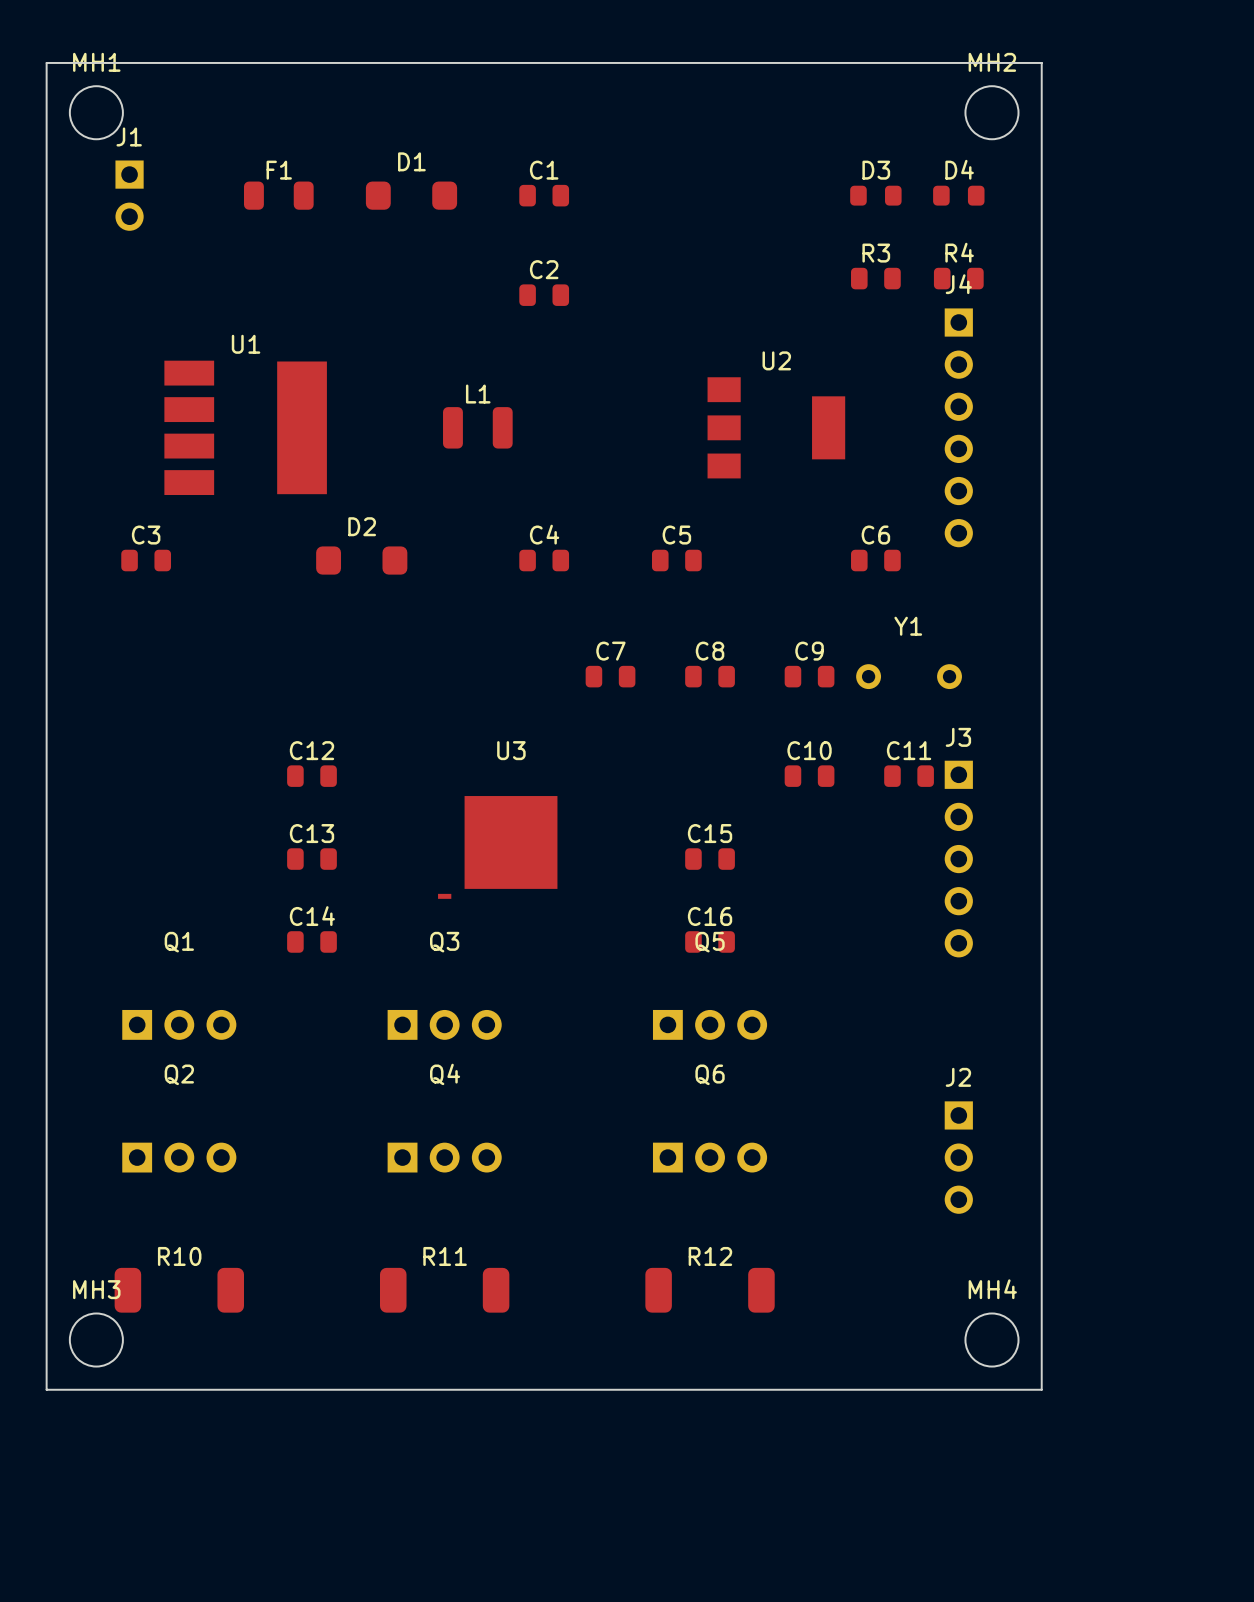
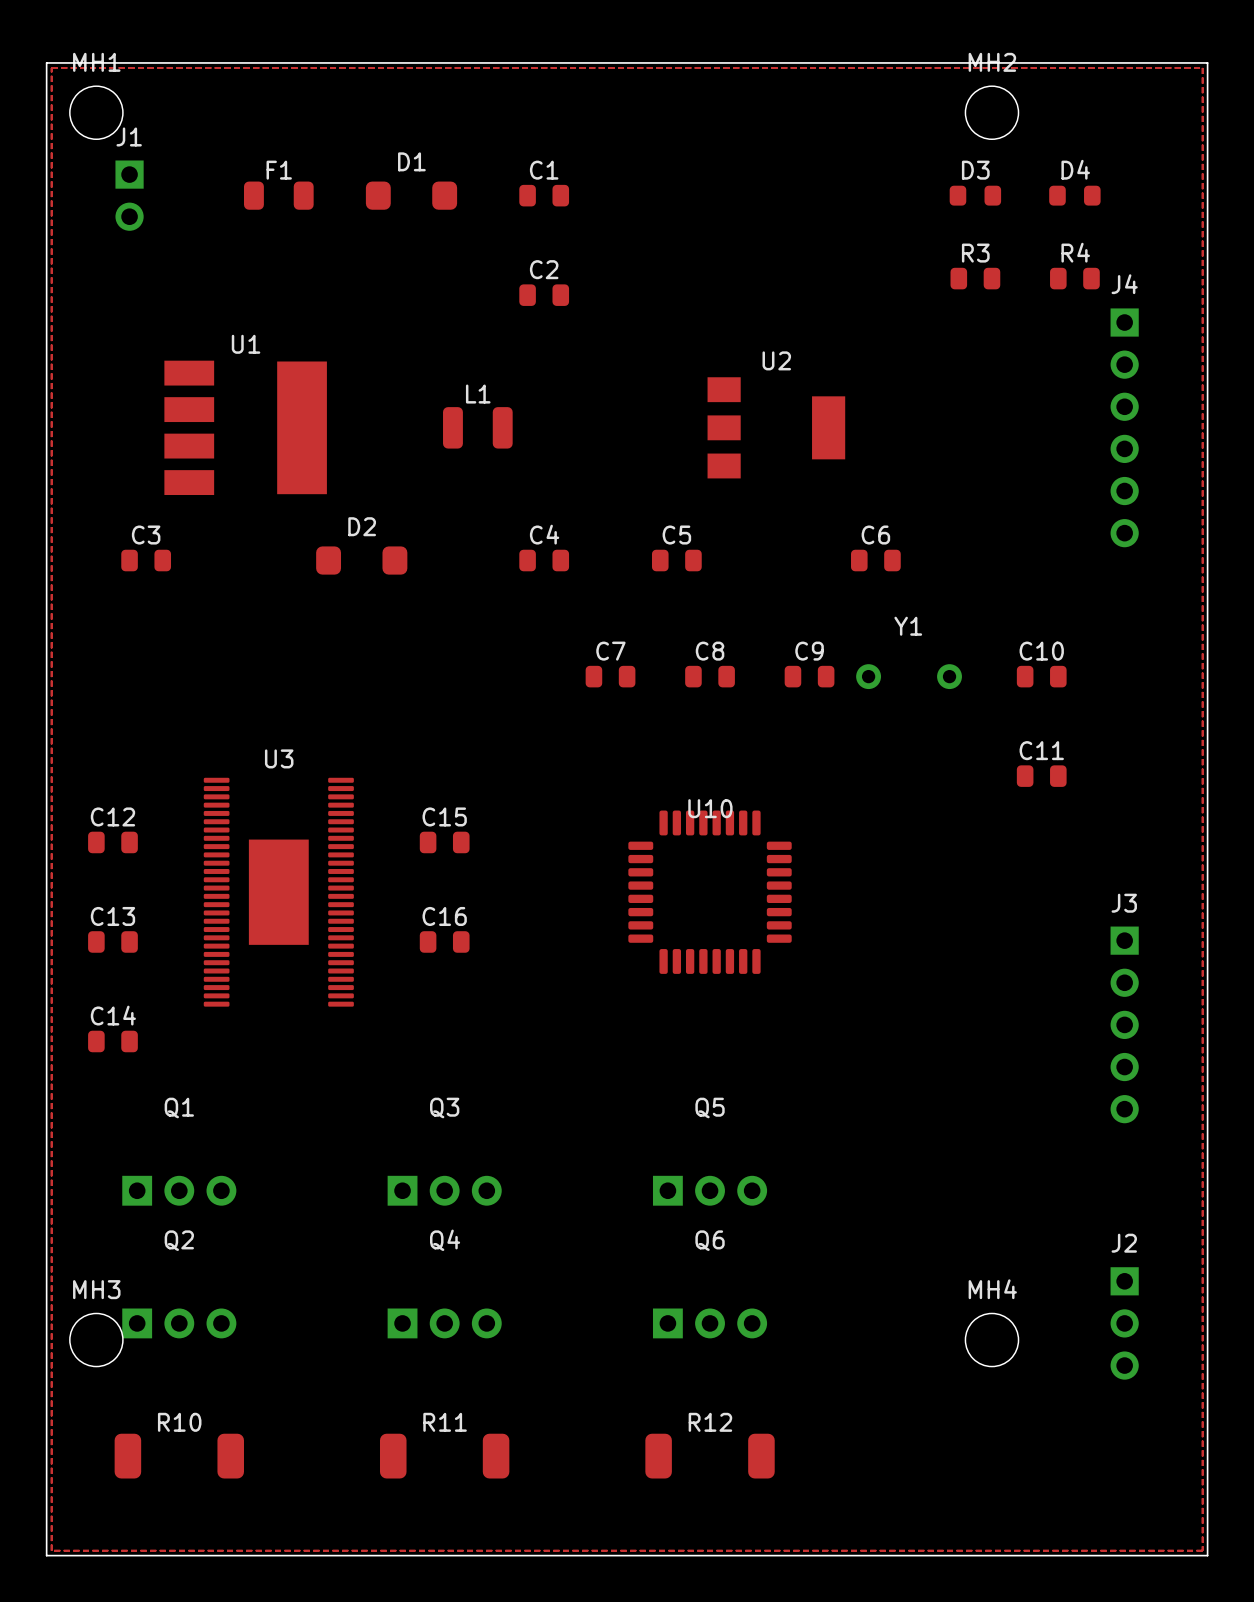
board edge: (1041, 62) (1041, 1389) (46, 1389) -> (1041, 62) (1207, 62) (1207, 1555) (46, 1555) (46, 1389)
zone outline: none -> (51, 67) (1202, 67) (1202, 1550) (51, 1550) (51, 67)
D3 position: (875, 195) -> (975, 195)
D4 position: (958, 195) -> (1074, 195)
R3 position: (875, 278) -> (975, 278)
R4 position: (958, 278) -> (1074, 278)
J4 position: (958, 427) -> (1124, 427)
U3 name position: U3 (511, 750) -> U3 (279, 758)
C12 position: (311, 776) -> (112, 842)
C10 position: (809, 776) -> (1041, 676)
C11 position: (909, 776) -> (1041, 776)
U3 footprint: [438, 796, 558, 899] -> [203, 777, 354, 1007]
C13 position: (311, 859) -> (112, 941)
C15 position: (710, 859) -> (444, 842)
J3 position: (958, 859) -> (1124, 1024)
U10: none -> (710, 892)
C14 position: (311, 941) -> (112, 1041)
C16 position: (710, 941) -> (444, 941)
Q1 position: (179, 1024) -> (179, 1190)
Q3 position: (444, 1024) -> (444, 1190)
Q5 position: (710, 1024) -> (710, 1190)
Q2 position: (179, 1157) -> (179, 1323)
Q4 position: (444, 1157) -> (444, 1323)
Q6 position: (710, 1157) -> (710, 1323)
J2 position: (958, 1157) -> (1124, 1323)
R10 position: (179, 1290) -> (179, 1456)
R11 position: (444, 1290) -> (444, 1456)
R12 position: (710, 1290) -> (710, 1456)

